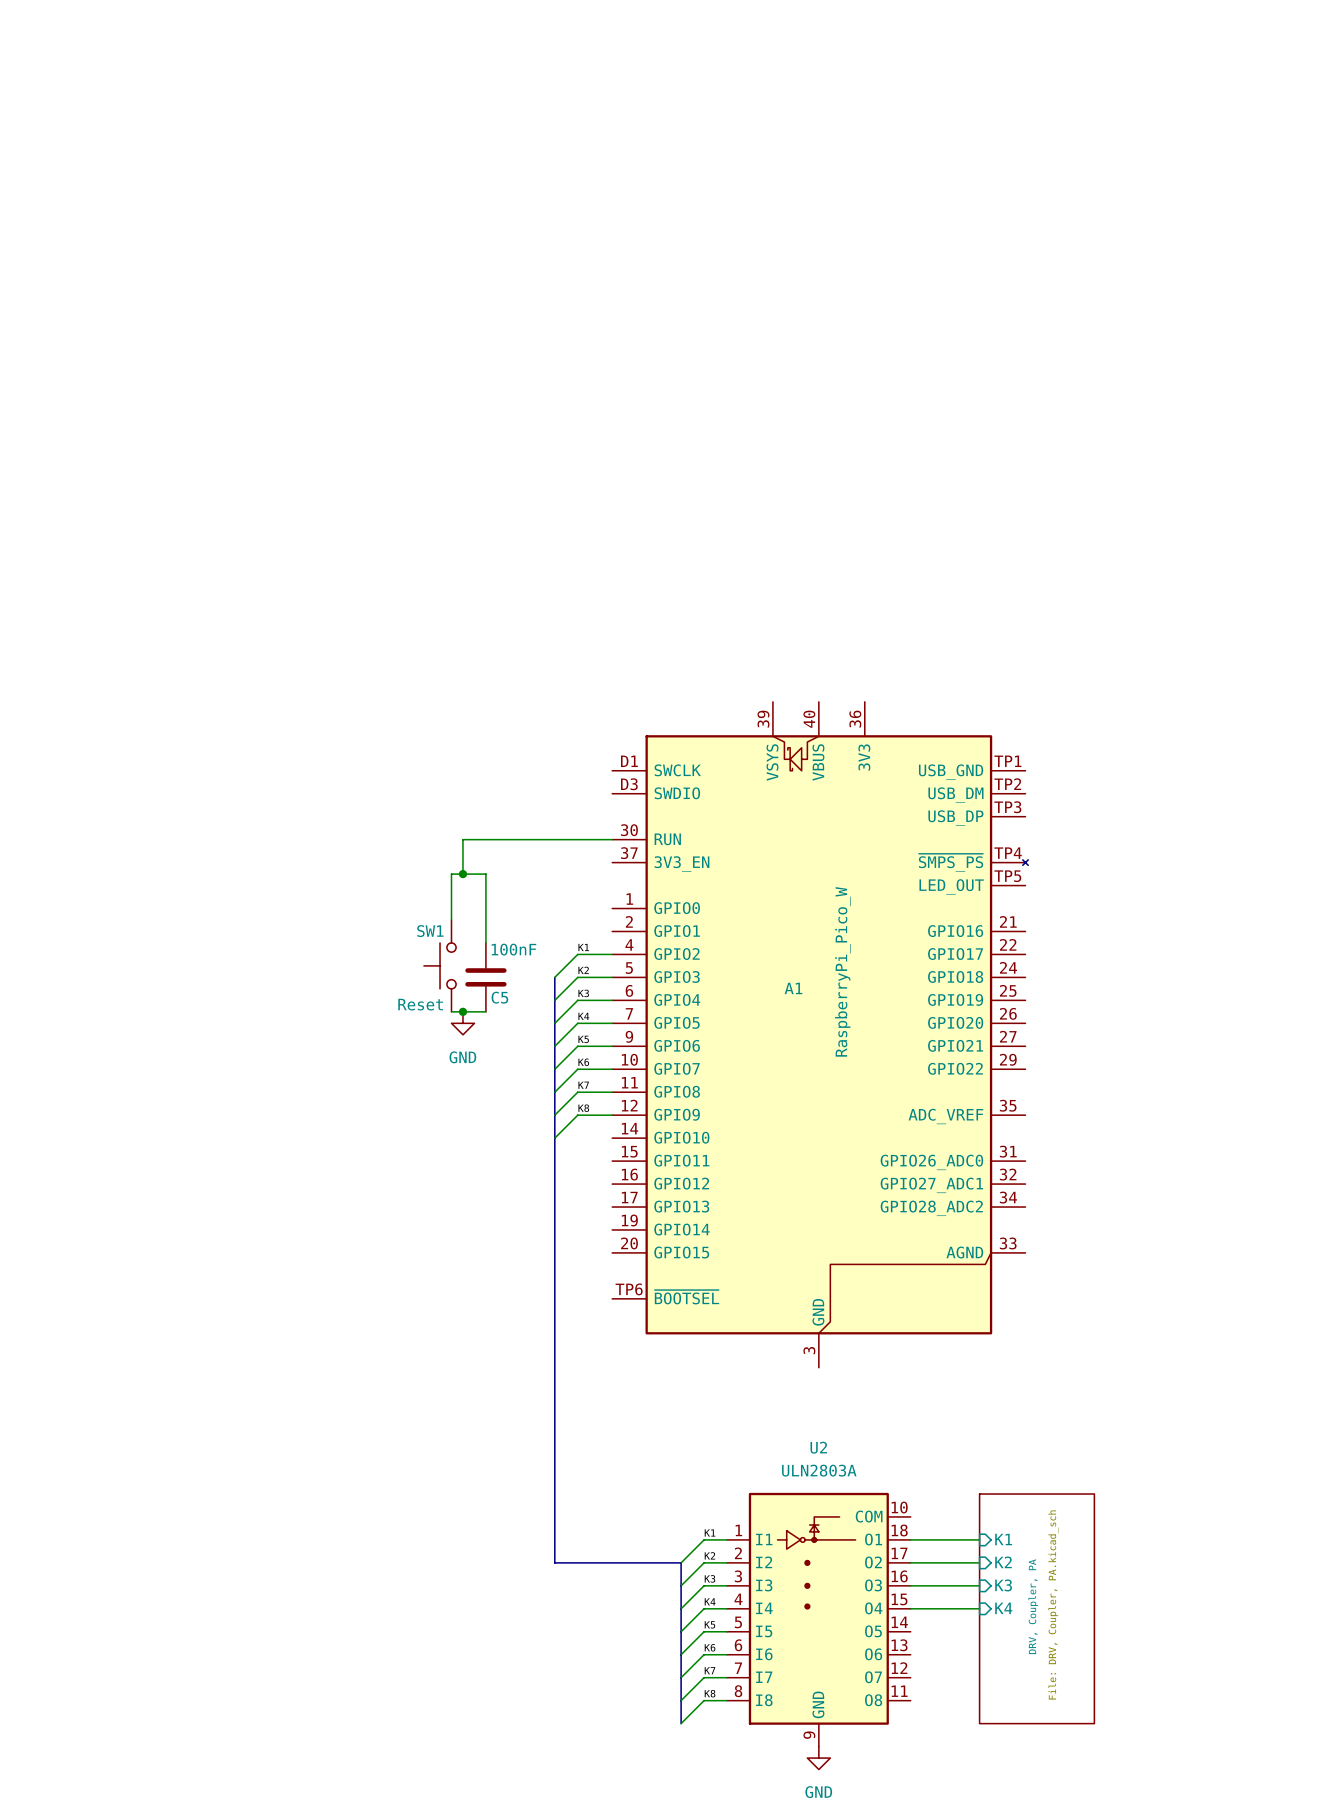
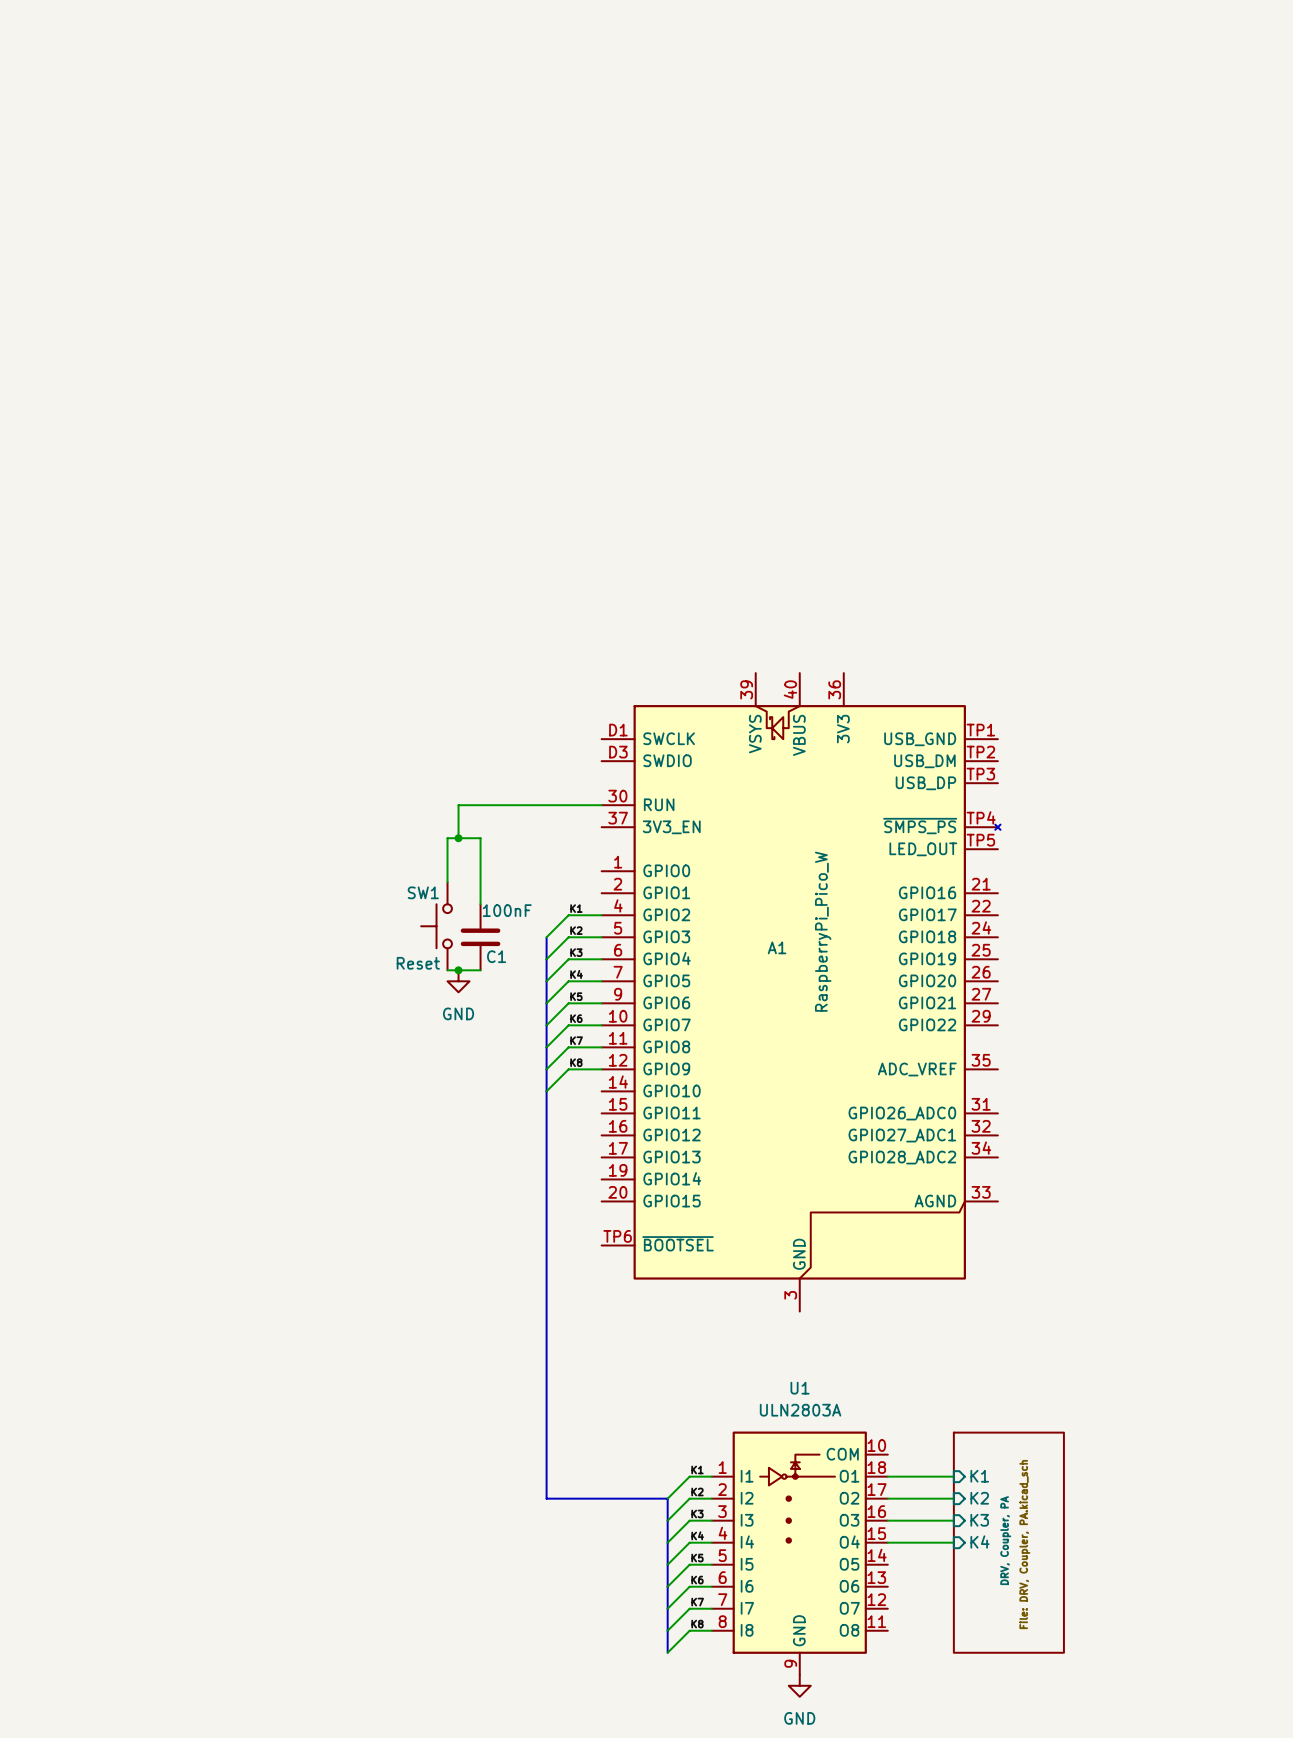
C5 name: C5 (499, 997) -> C1 (496, 956)
U2 name: U2 (818, 1447) -> U1 (800, 1388)

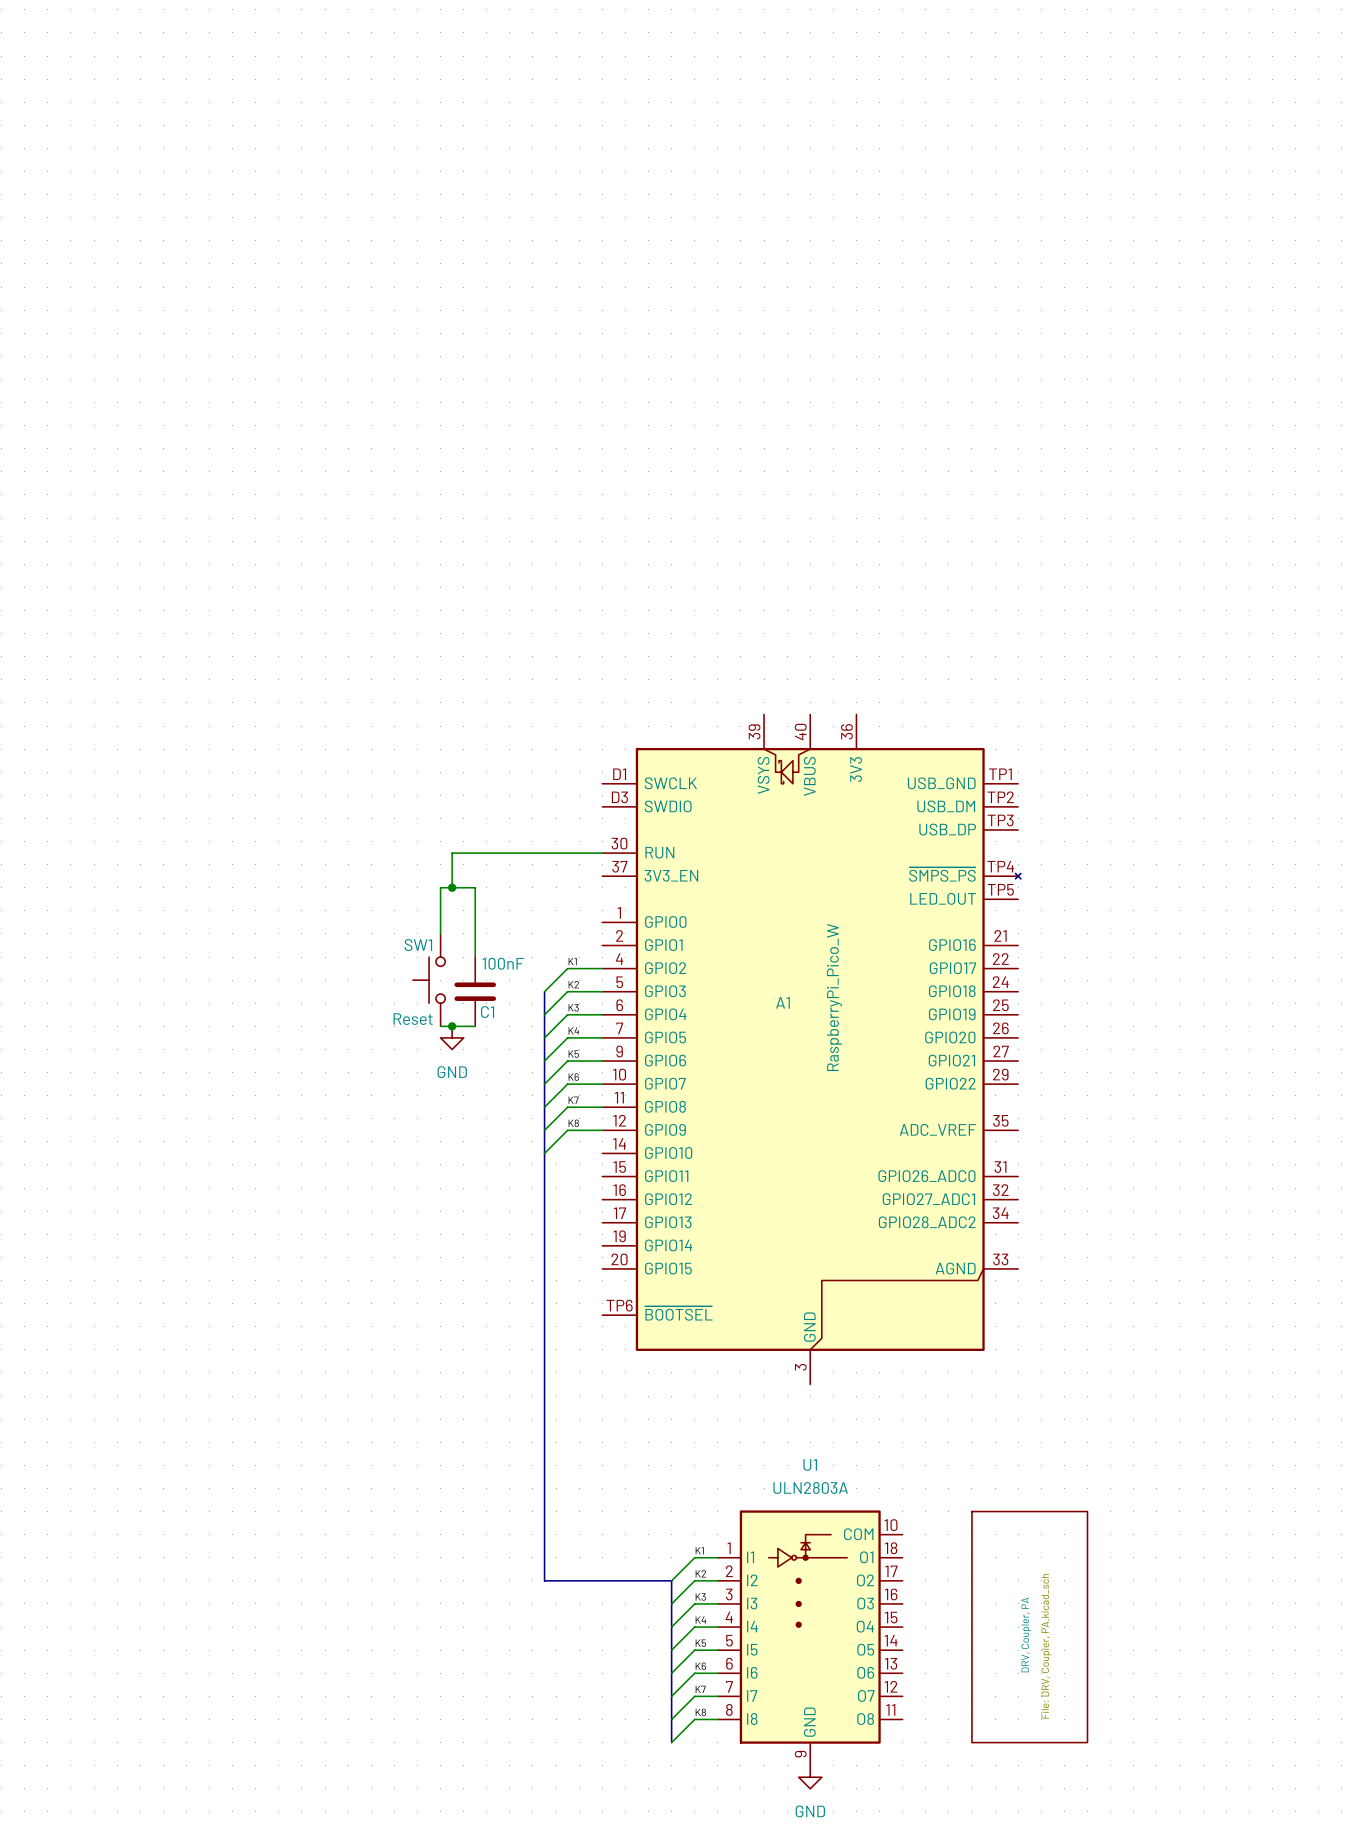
wire: (887, 1476) (953, 1476) -> none
sheet pin: K1 (979, 1476) -> none
wire: (887, 1498) (953, 1498) -> none
sheet pin: K2 (979, 1498) -> none
wire: (887, 1520) (953, 1520) -> none
sheet pin: K3 (979, 1520) -> none
wire: (887, 1542) (953, 1542) -> none
sheet pin: K4 (979, 1542) -> none

